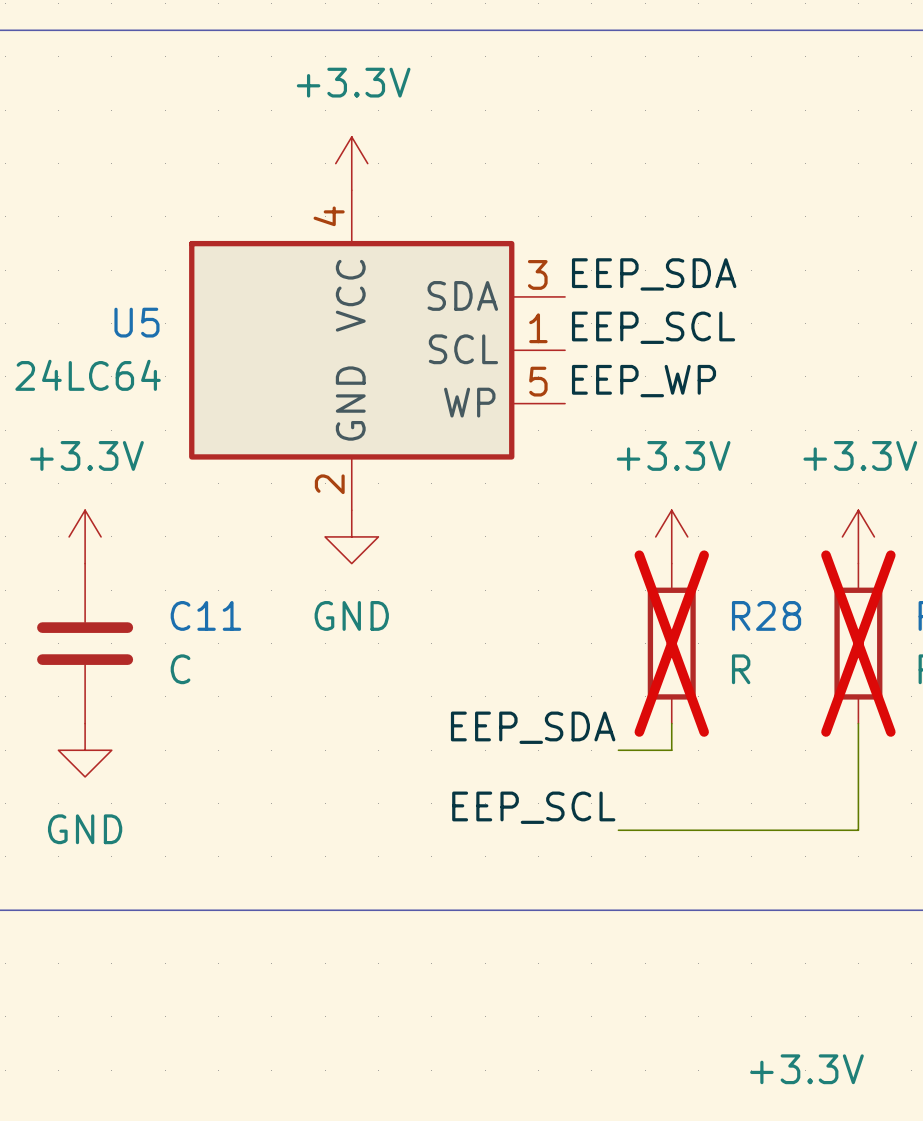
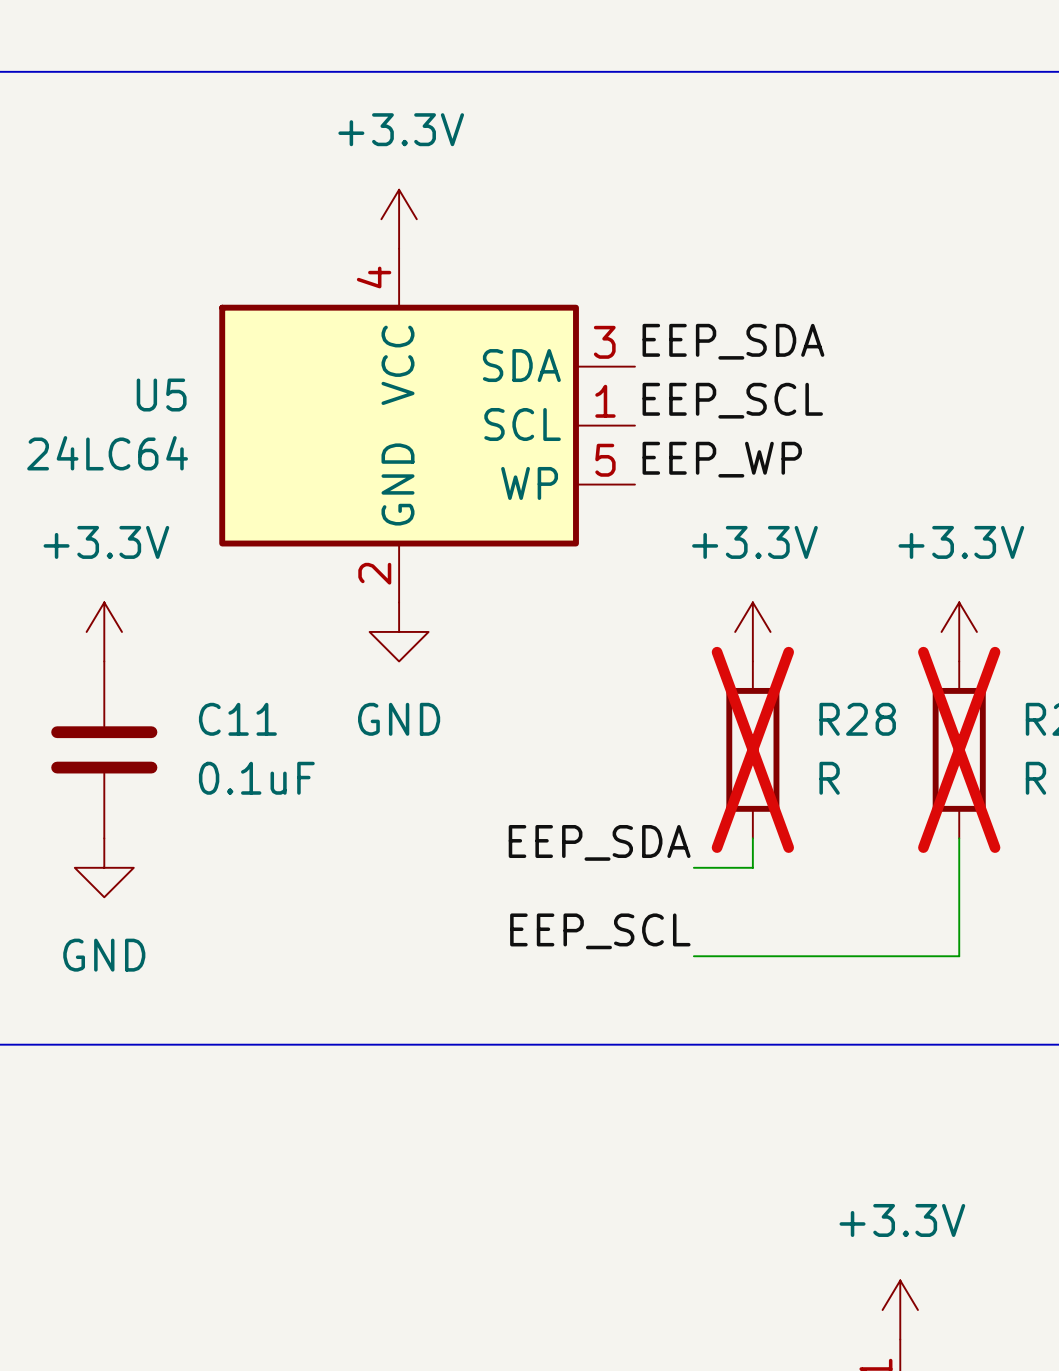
C11 value: C (180, 669) -> 0.1uF (256, 778)

